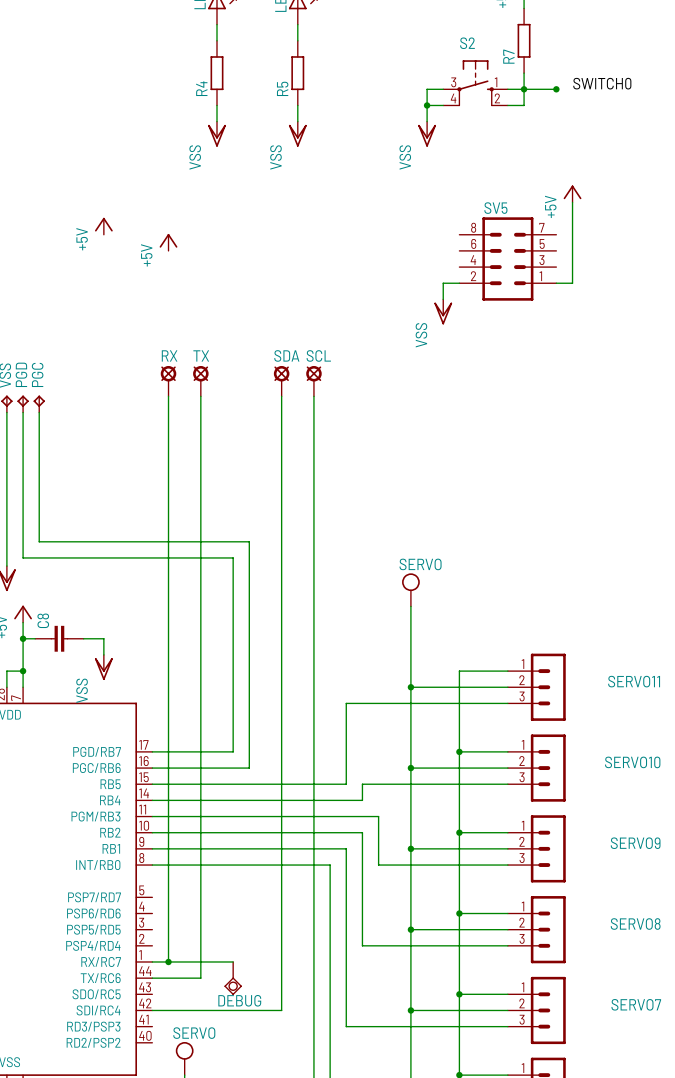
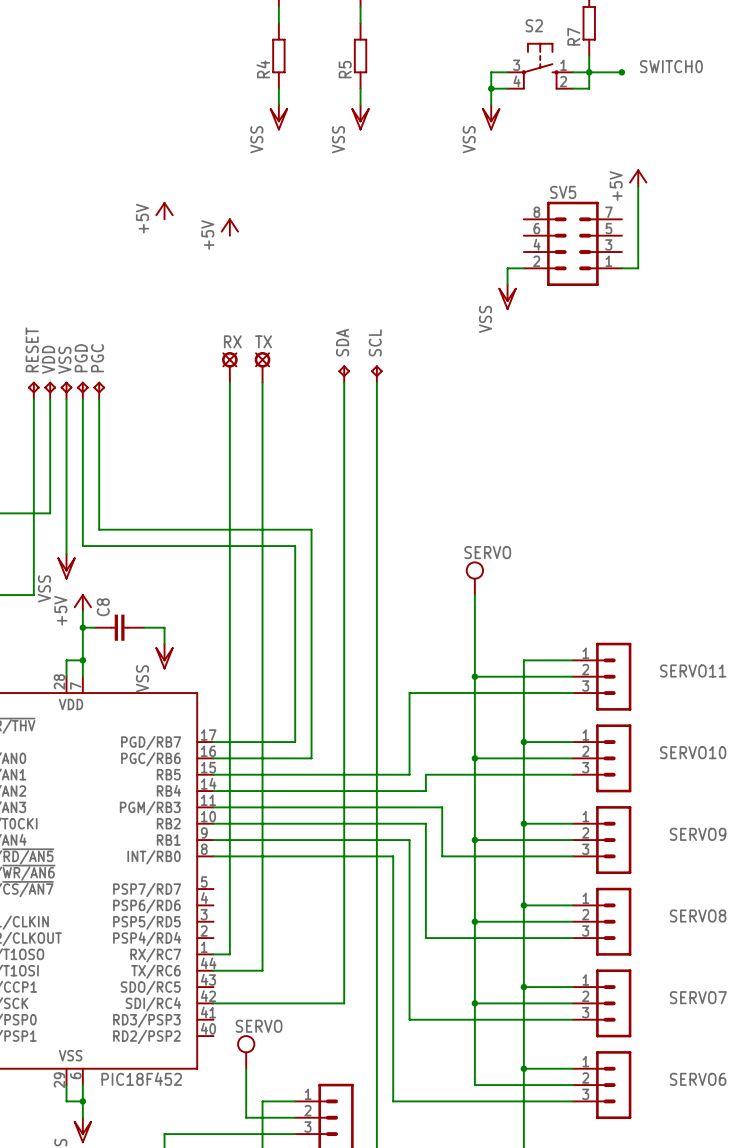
SDA: (281, 381) -> none
SCL: (313, 381) -> none
SDA: none -> (344, 374)
SCL: none -> (376, 374)
wire: (168, 961) (233, 961) -> none
junction: (168, 961) -> none
DEBUG: (233, 978) -> none

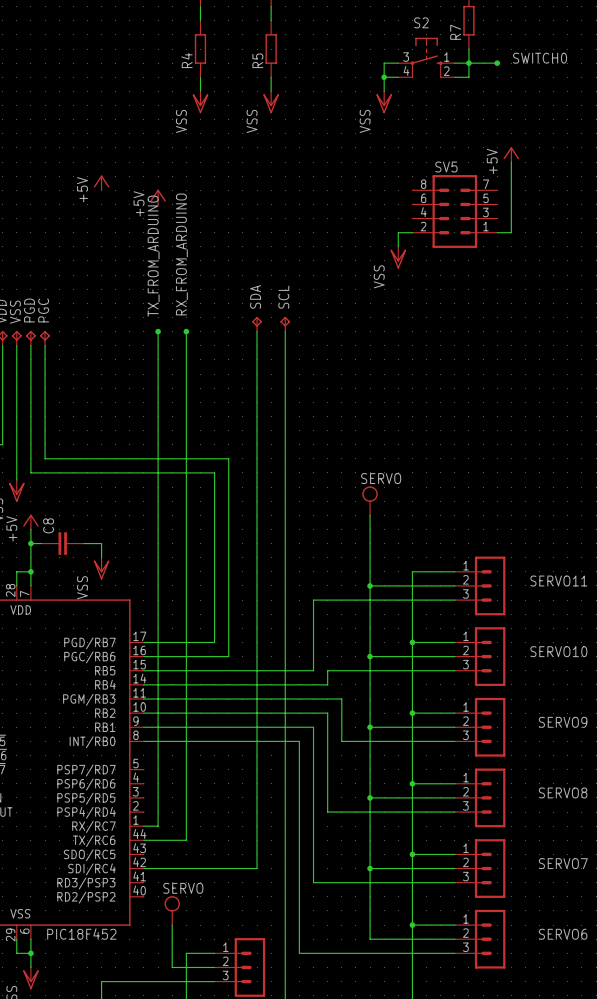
label: none -> RX_FROM_ARDUINO (181, 254)
label: none -> TX_FROM_ARDUINO (153, 256)
RX: (229, 367) -> none
TX: (262, 367) -> none
junction: none -> (158, 331)
junction: none -> (186, 331)

